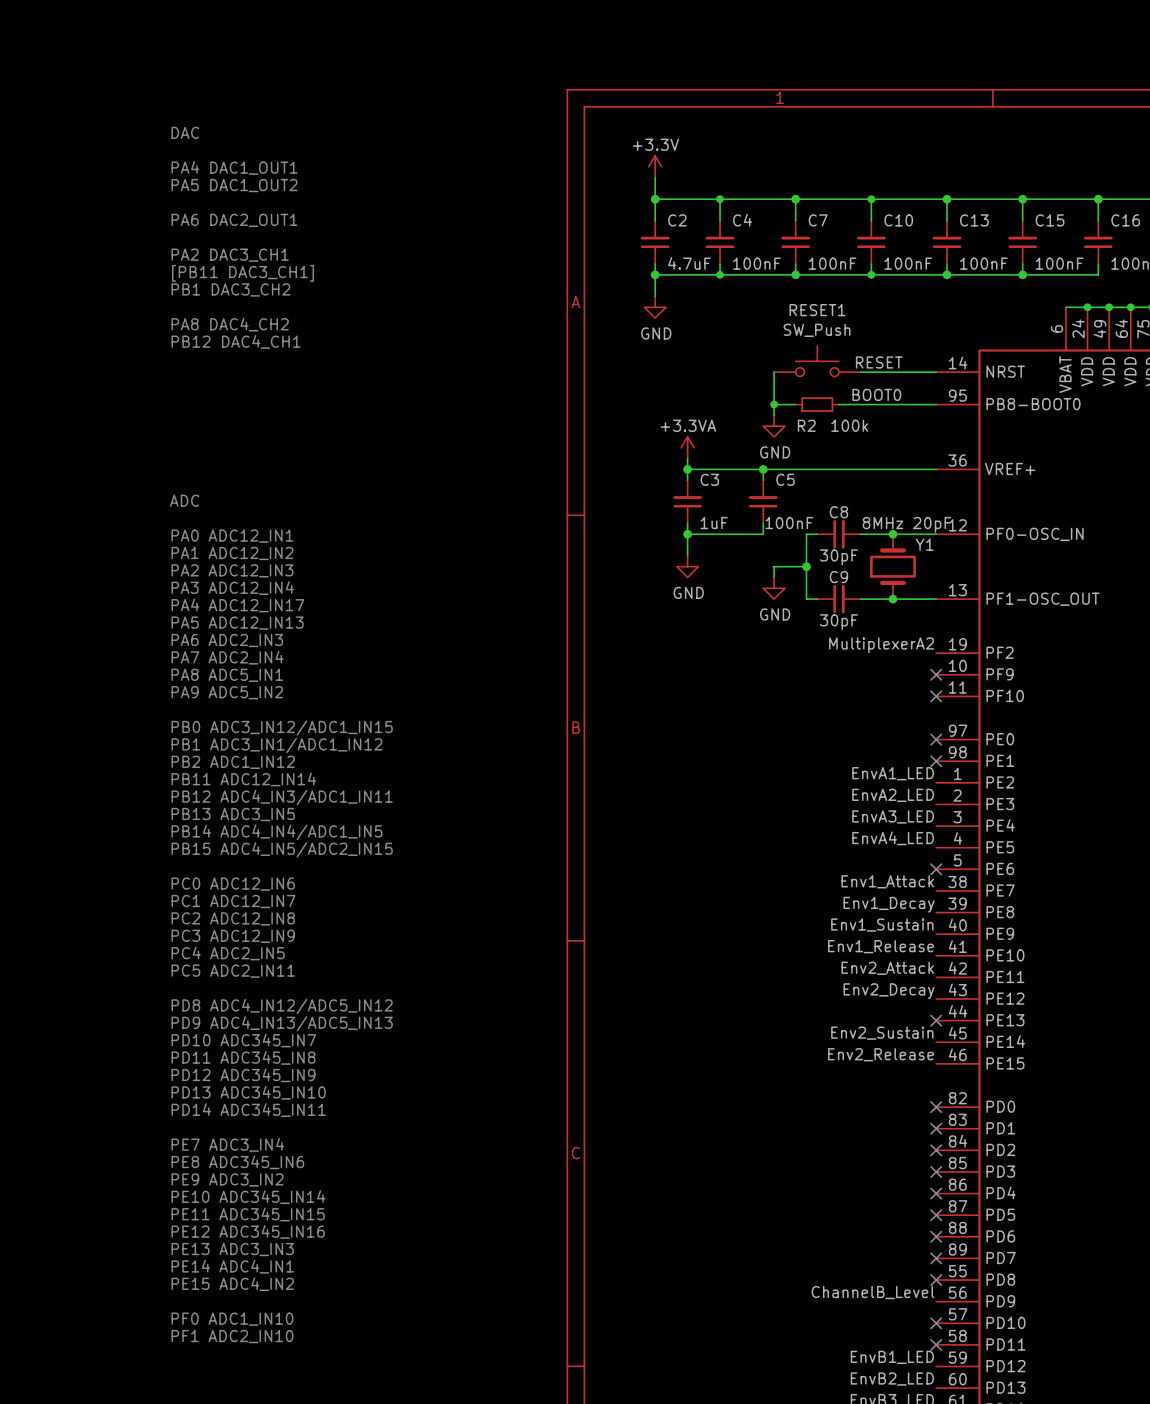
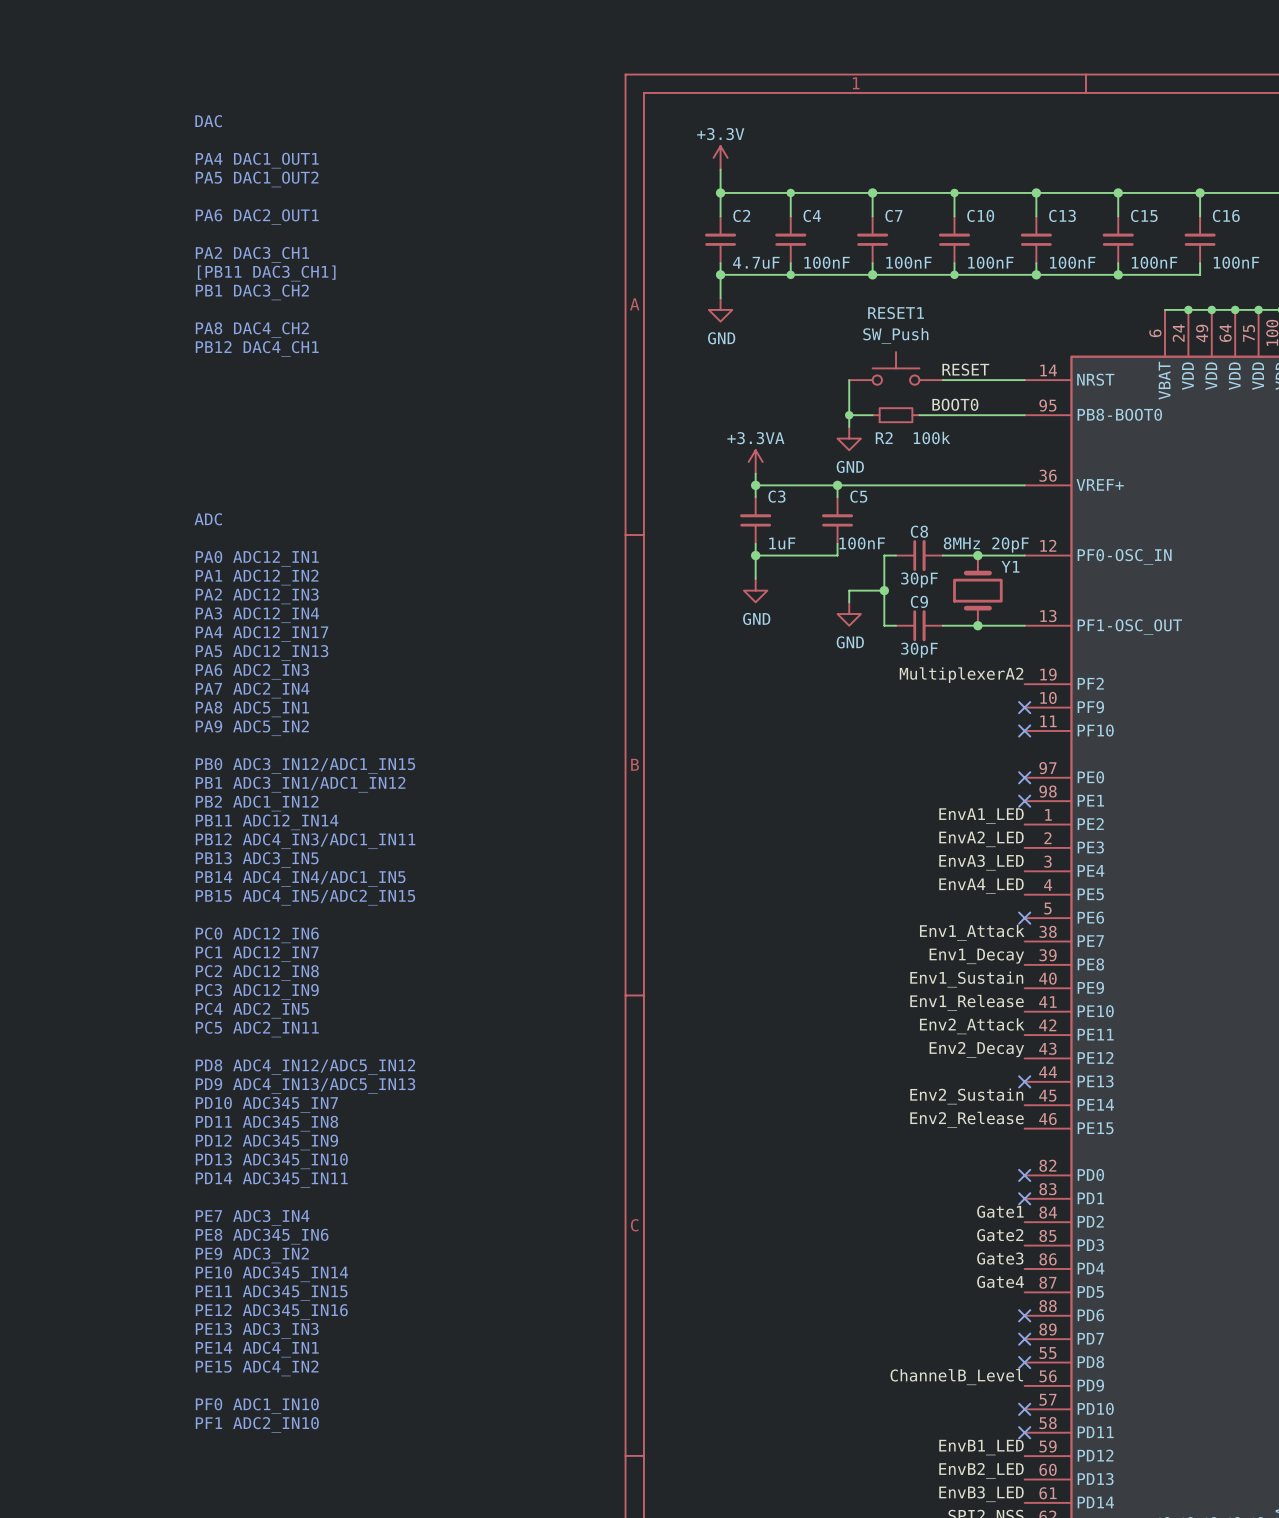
label: none -> Gate1 (1000, 1211)
no-connect mark: (936, 1150) -> none
label: none -> Gate2 (1000, 1235)
no-connect mark: (936, 1171) -> none
label: none -> Gate3 (1000, 1258)
no-connect mark: (936, 1193) -> none
label: none -> Gate4 (1000, 1281)
no-connect mark: (936, 1215) -> none

